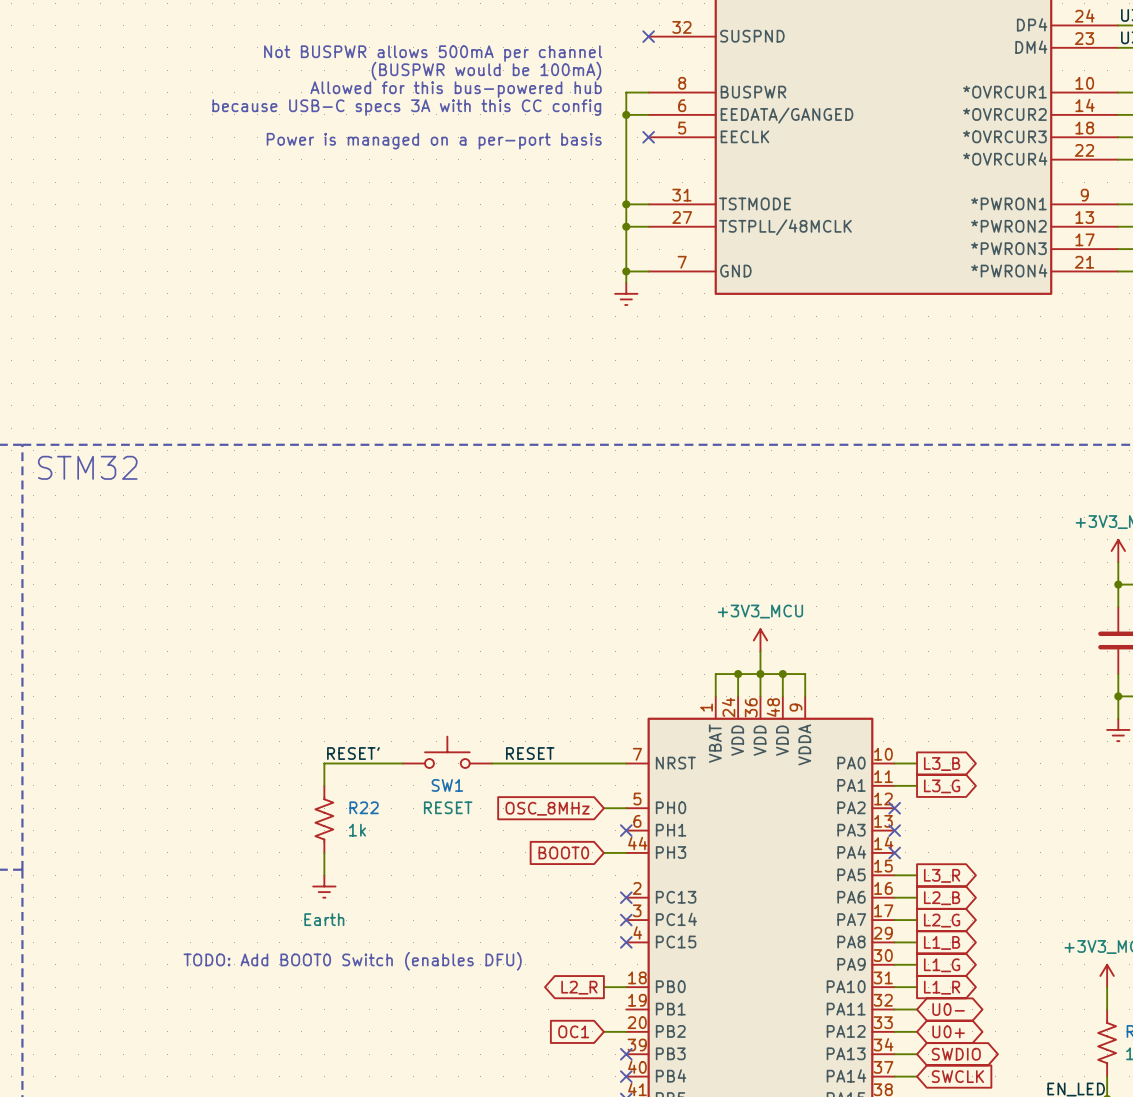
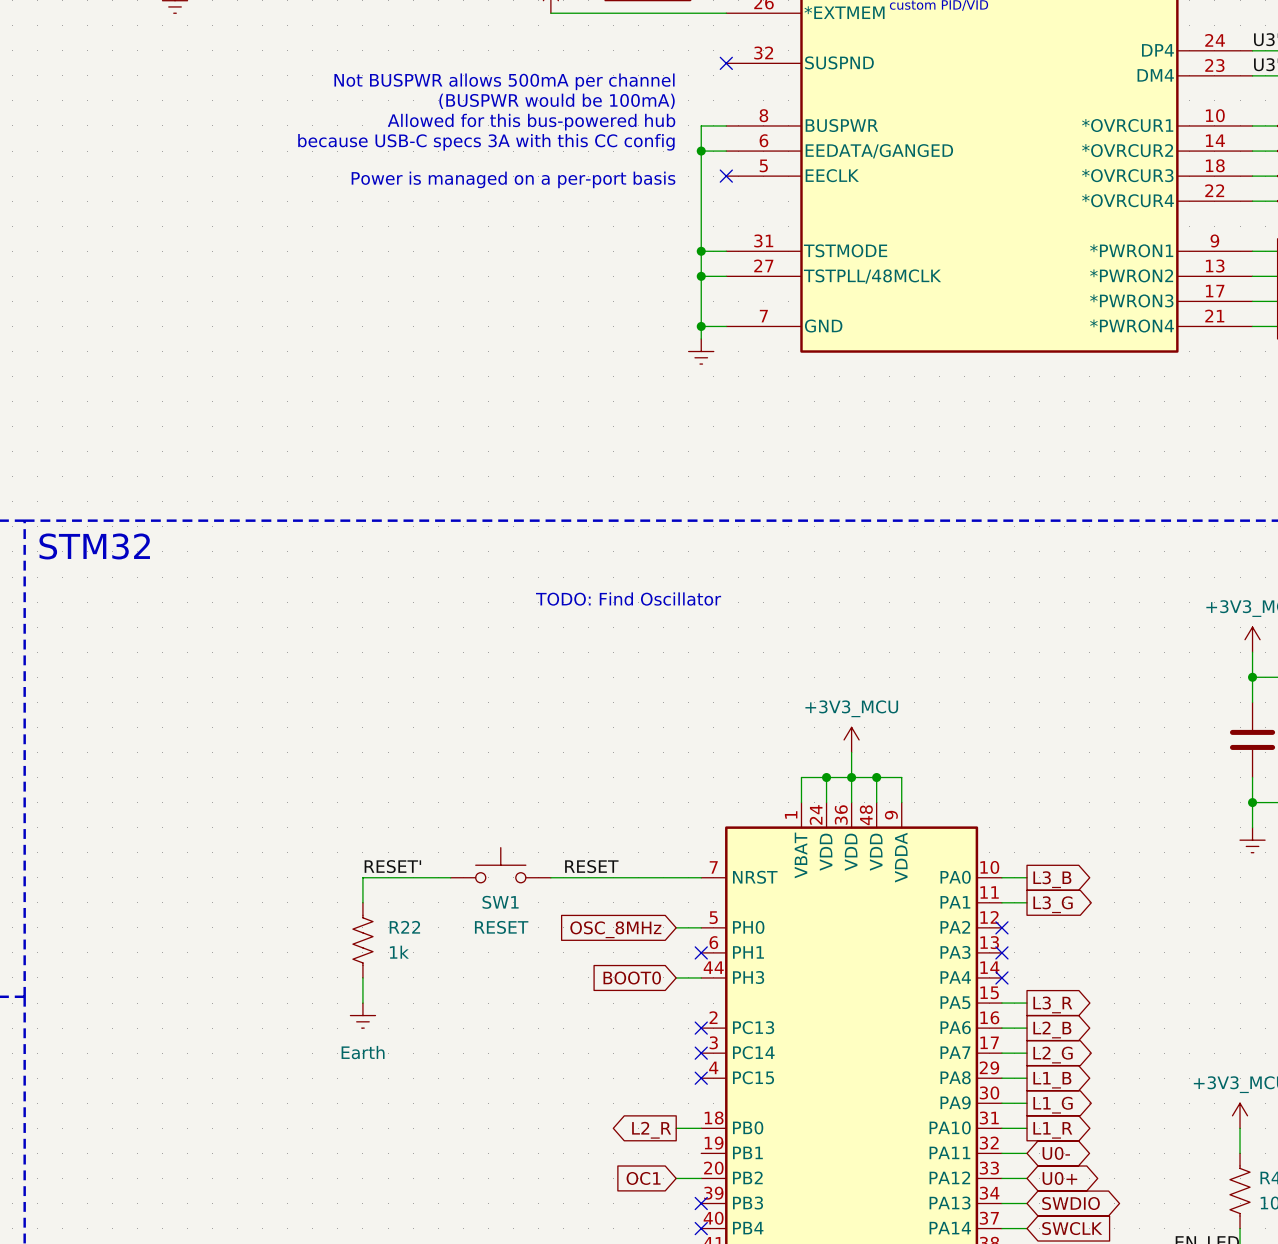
text: none -> TODO: Find Oscillator (628, 599)
text: TODO: Add BOOT0 Switch (enables DFU) (352, 961) -> none

